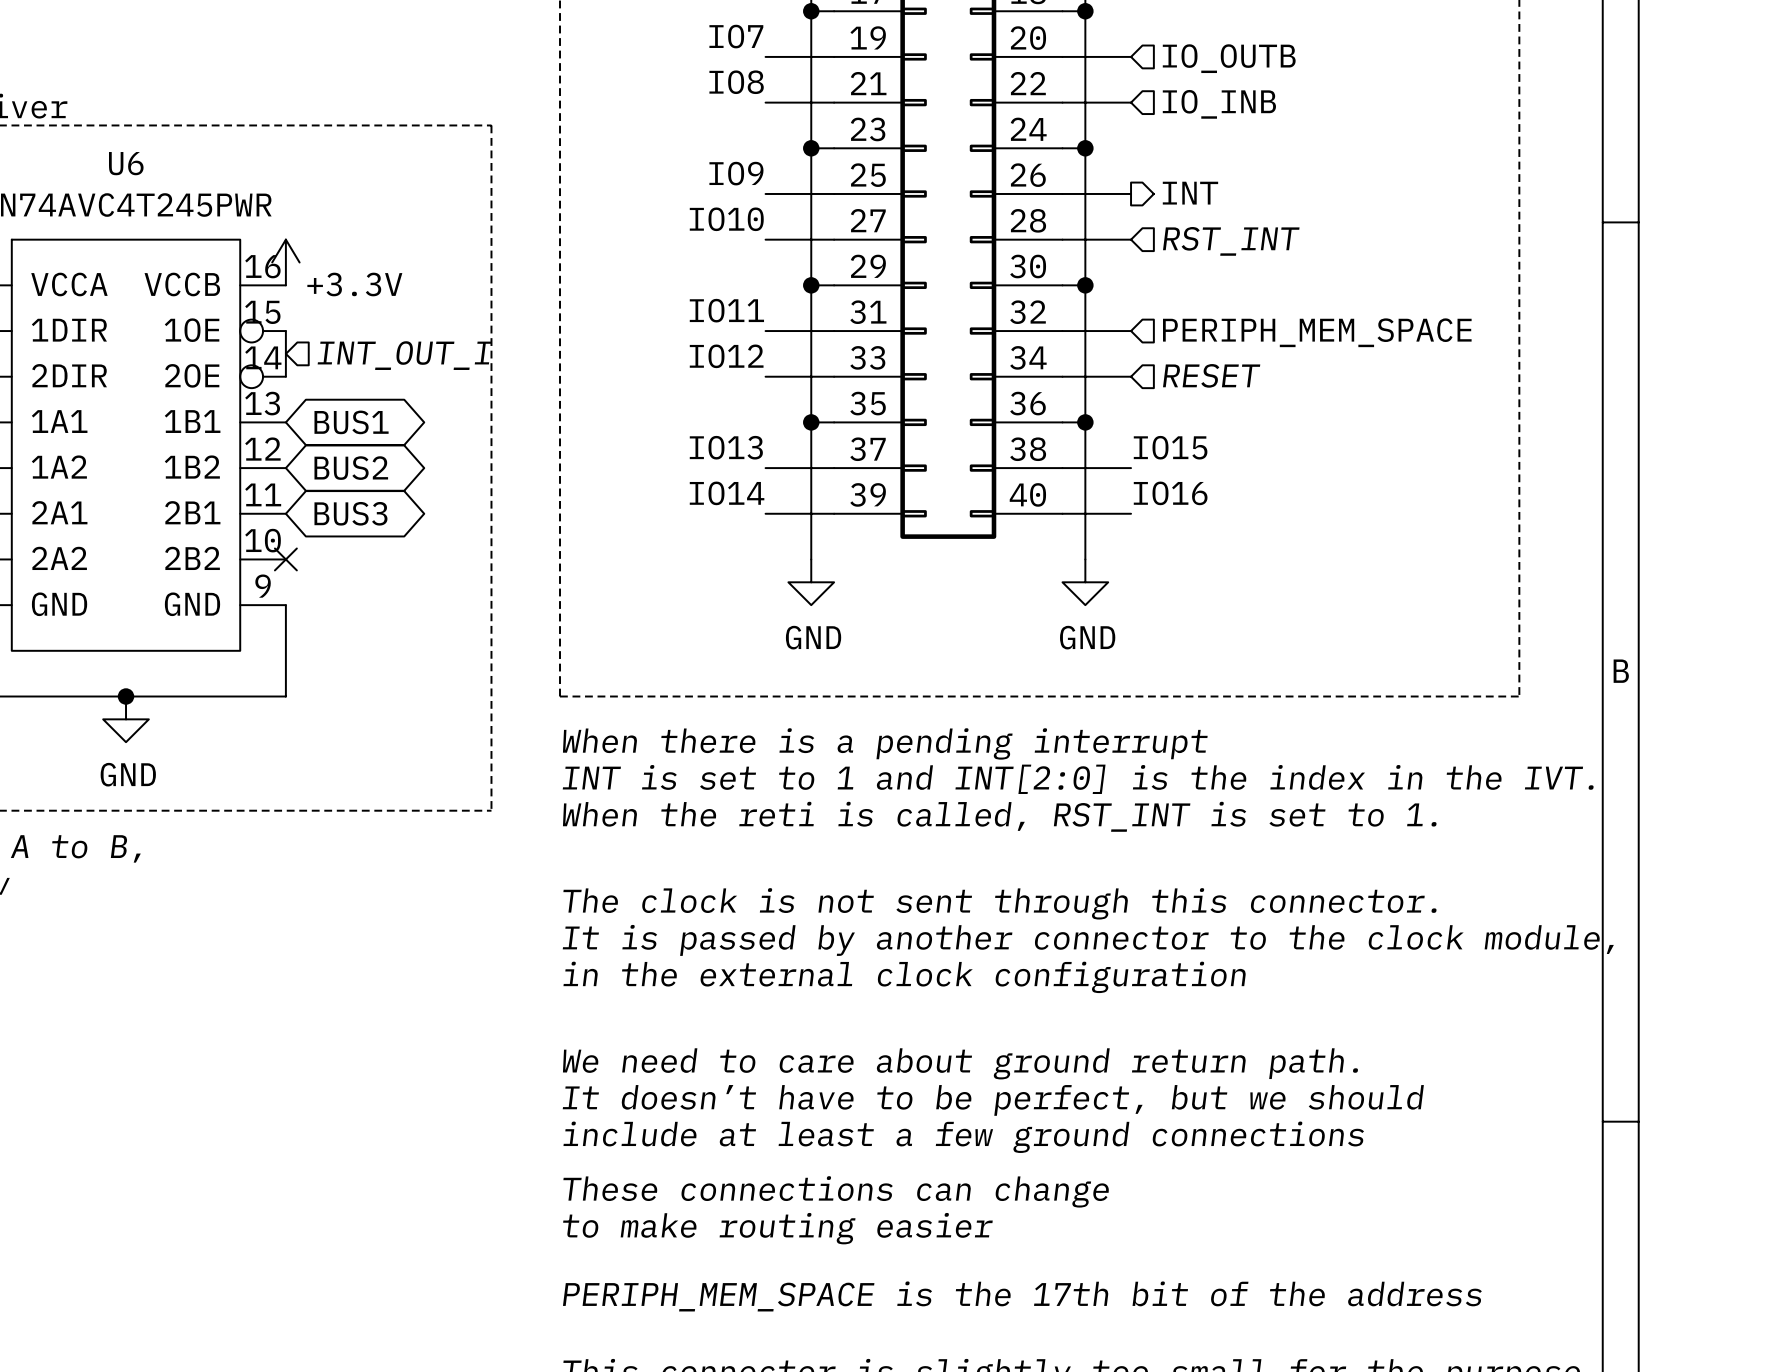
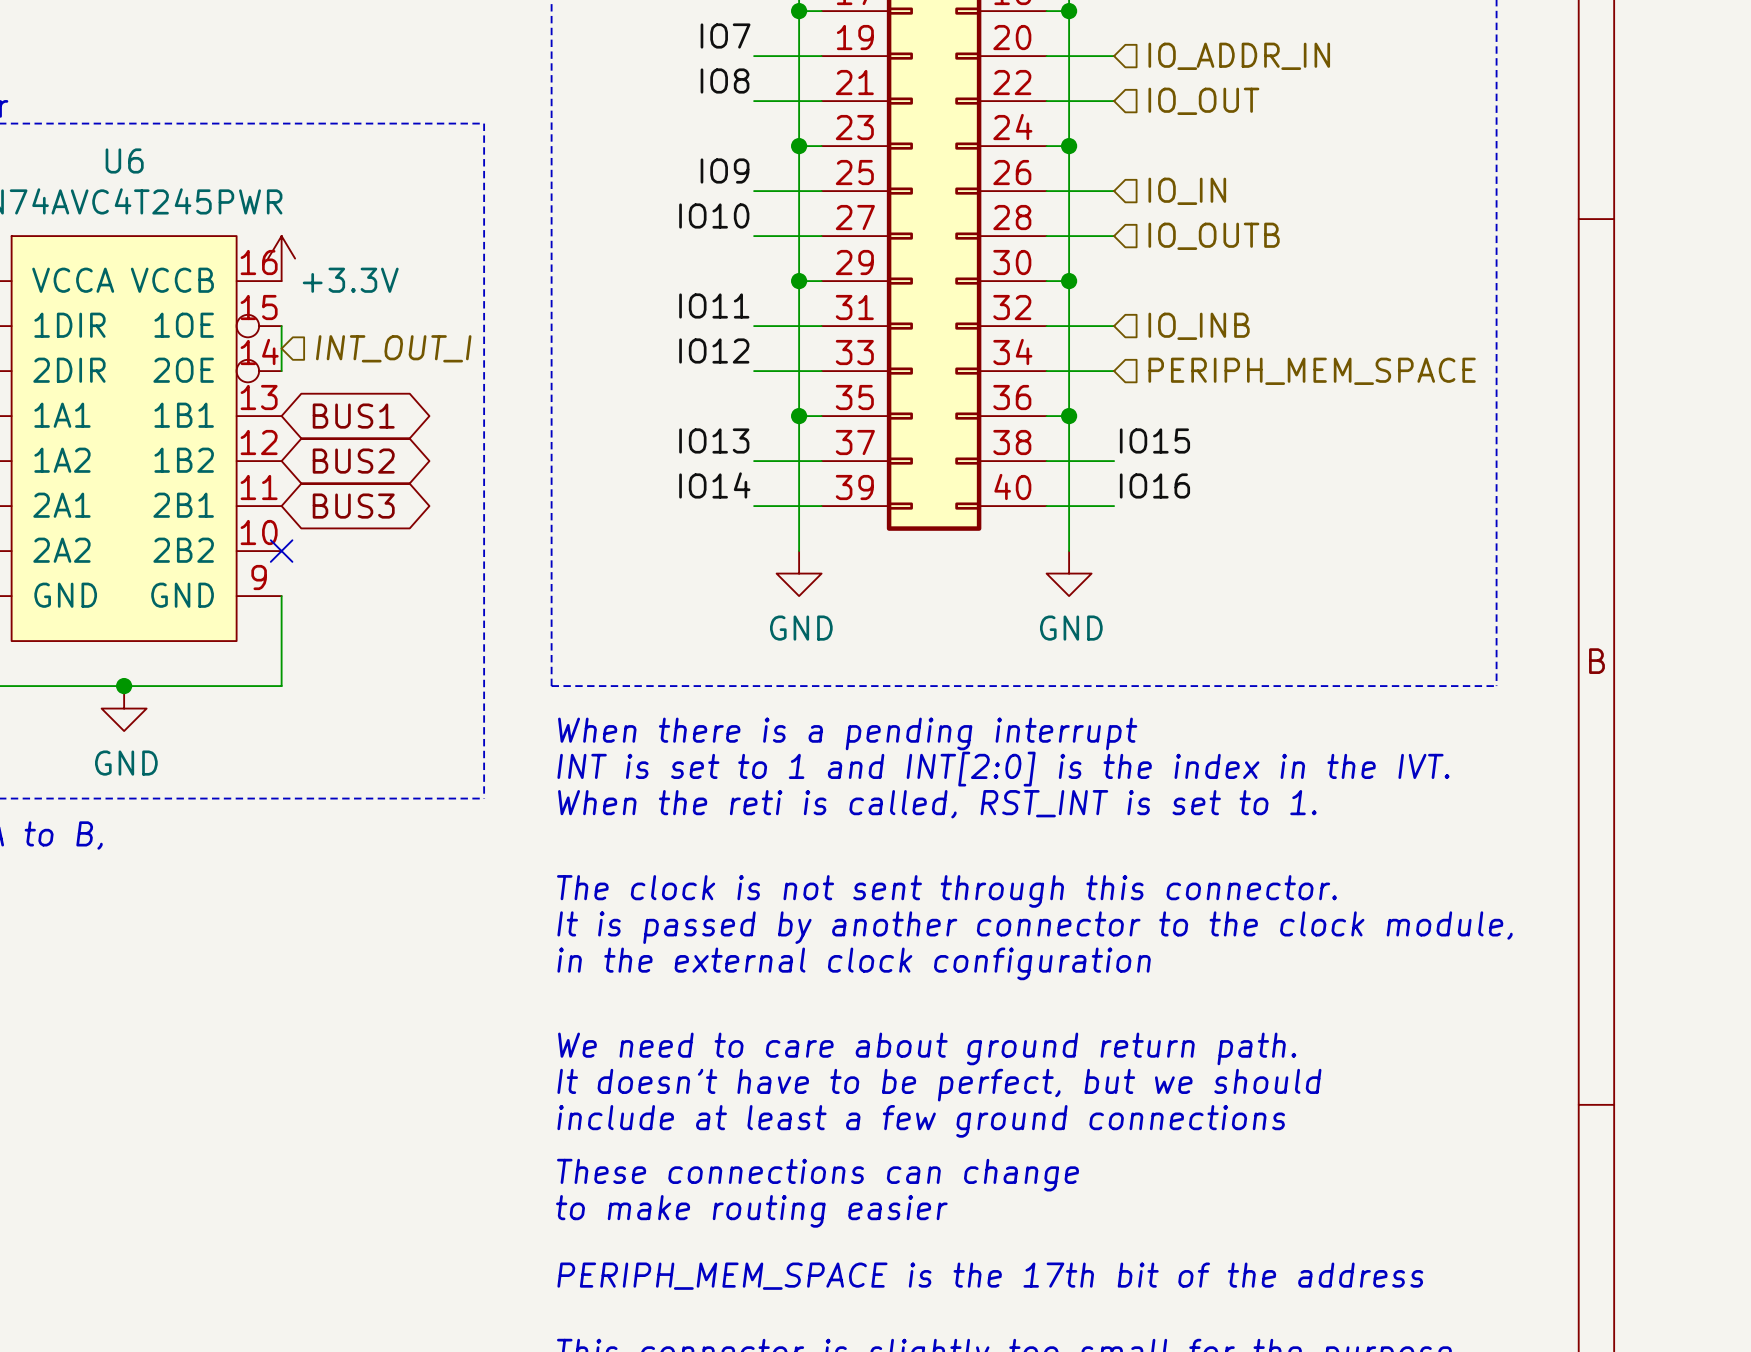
hierarchical label: IO_OUTB (1229, 58) -> IO_ADDR_IN (1239, 56)
hierarchical label: IO_INB (1219, 104) -> IO_OUT (1203, 101)
hierarchical label shape: output (1190, 193) -> input (1187, 191)
hierarchical label: INT (1190, 193) -> IO_IN (1187, 191)
hierarchical label: RST_INT (1231, 241) -> IO_OUTB (1214, 236)
hierarchical label: PERIPH_MEM_SPACE (1317, 332) -> IO_INB (1199, 326)
hierarchical label: RESET (1211, 375) -> PERIPH_MEM_SPACE (1312, 371)

